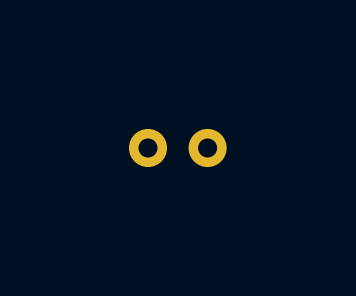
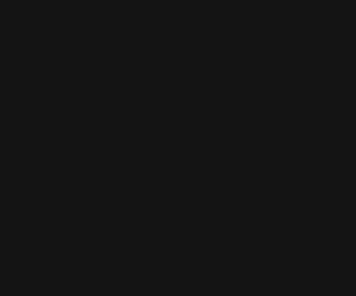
part: (177, 148) -> none

